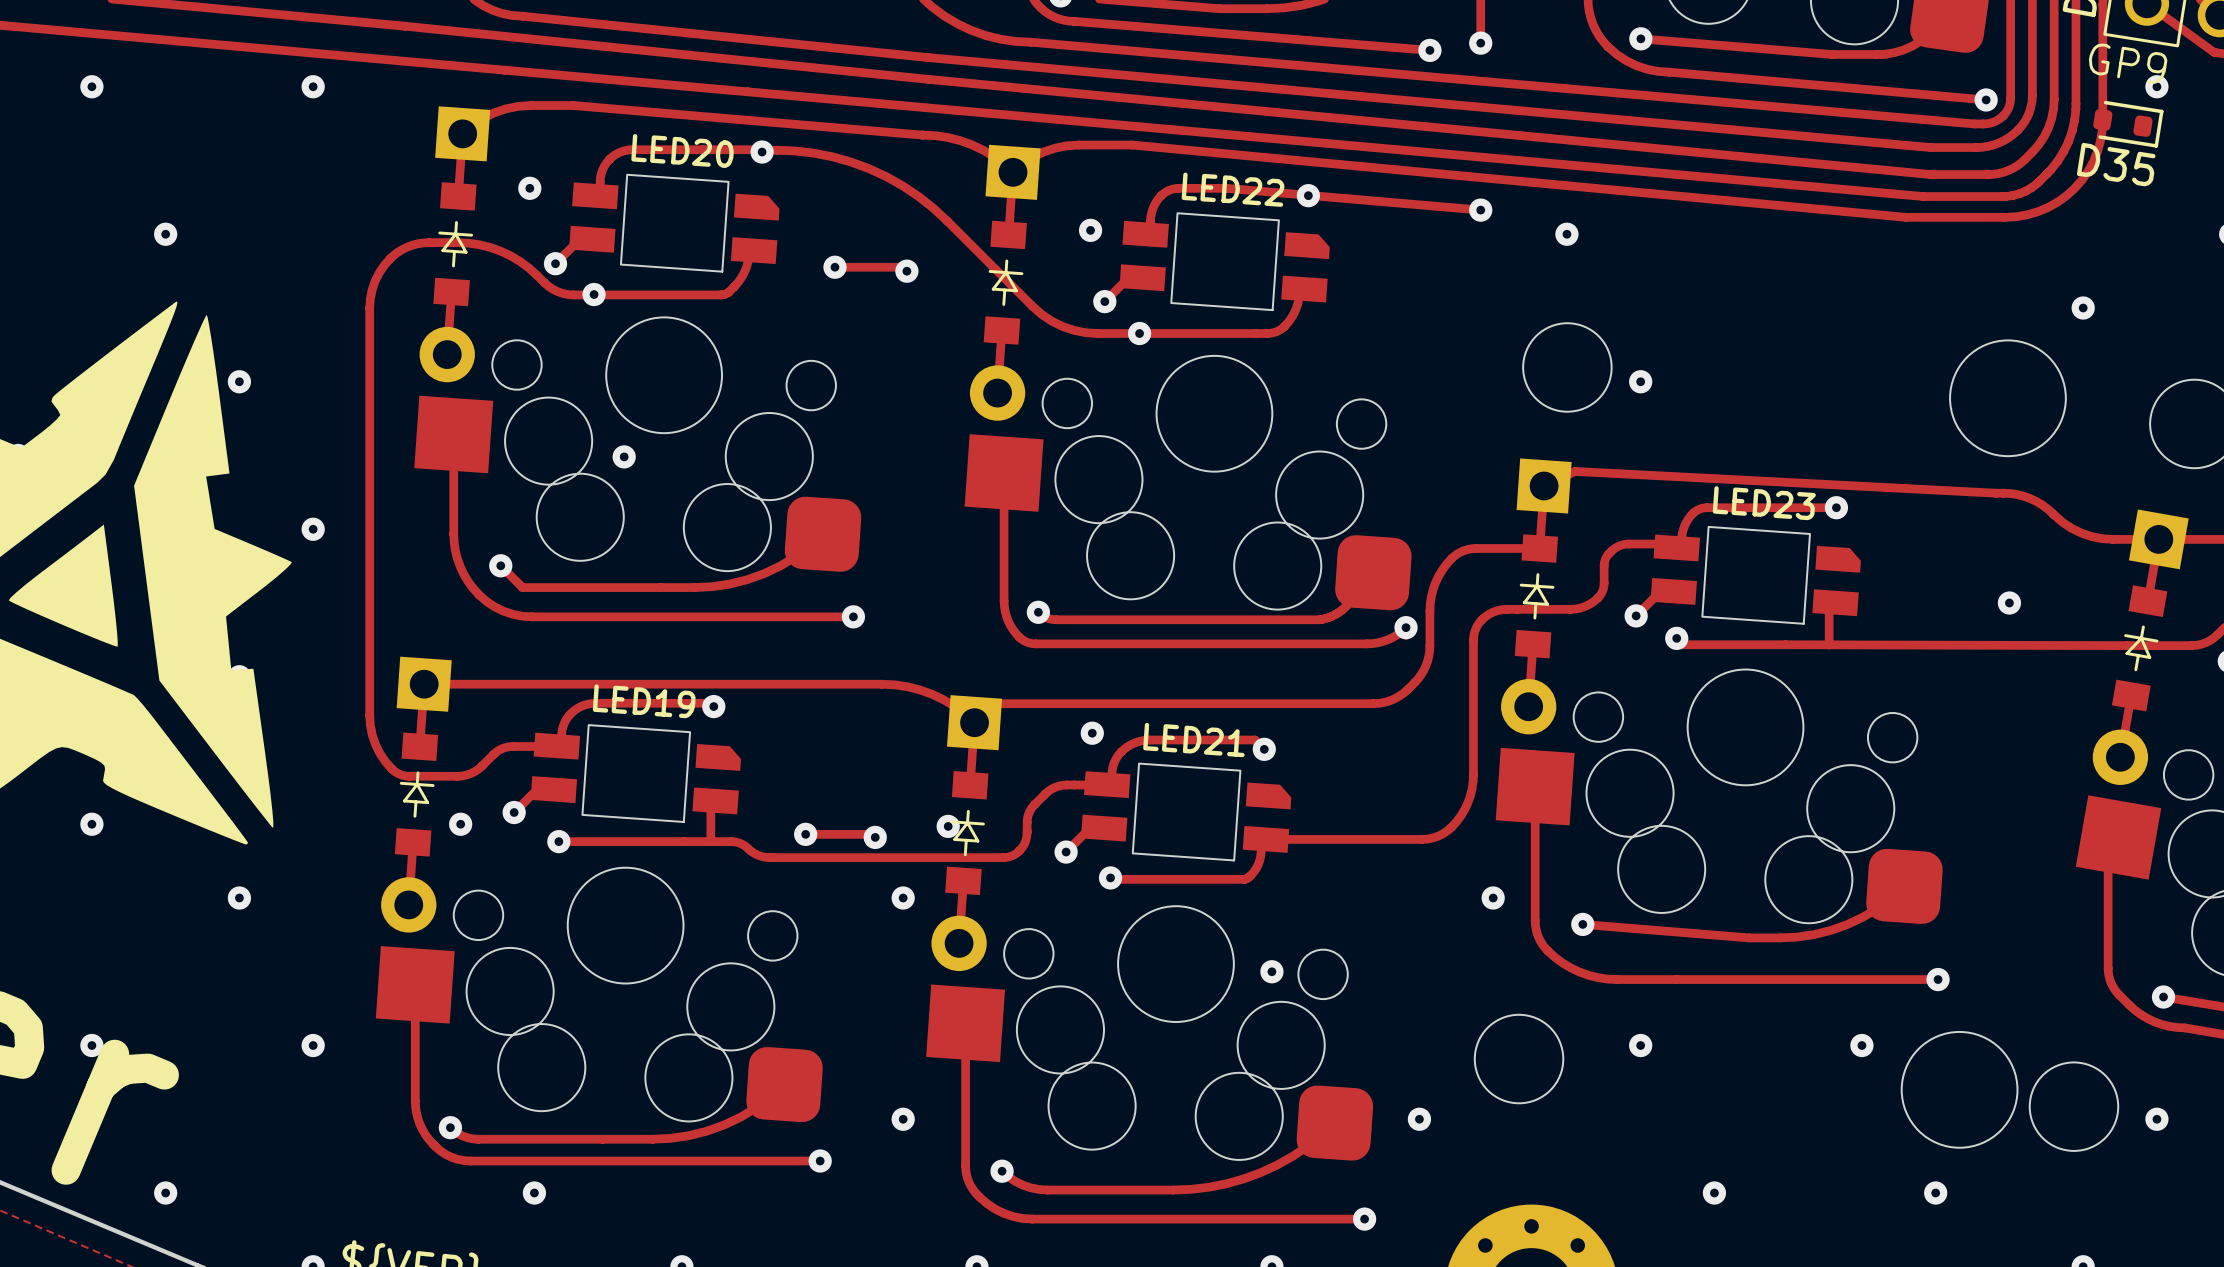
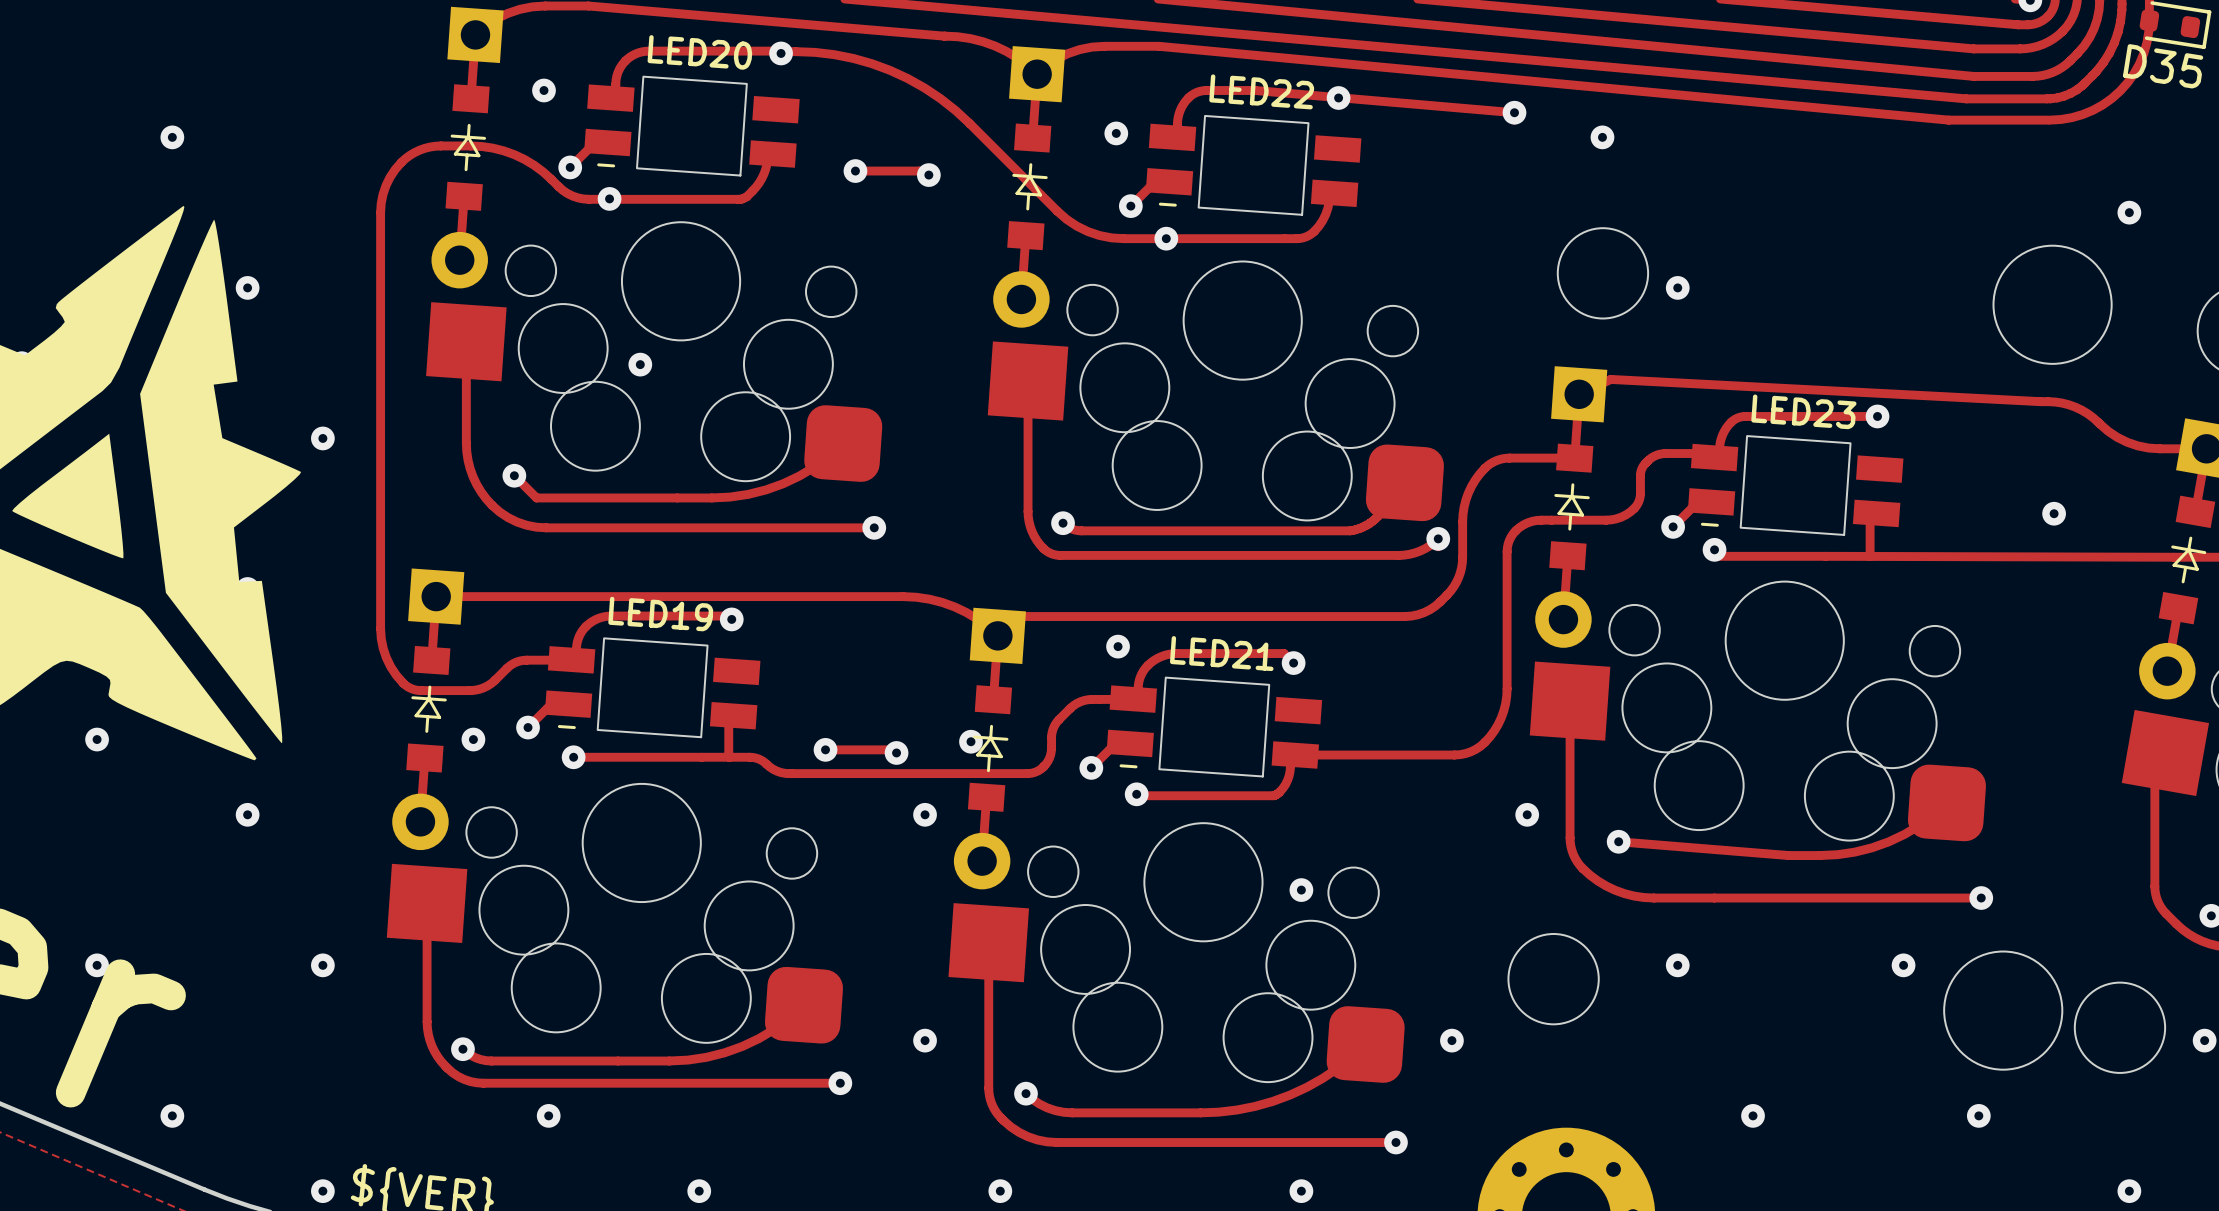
LED20 footprint: [569, 174, 780, 272] -> [584, 76, 800, 176]
LED22 footprint: [1119, 213, 1330, 311] -> [1145, 115, 1362, 215]
LED23 footprint: [1650, 526, 1861, 624] -> [1687, 435, 1904, 536]
LED19 footprint: [530, 724, 741, 823] -> [544, 638, 761, 738]
LED21 footprint: [1080, 763, 1292, 861] -> [1106, 677, 1323, 777]

